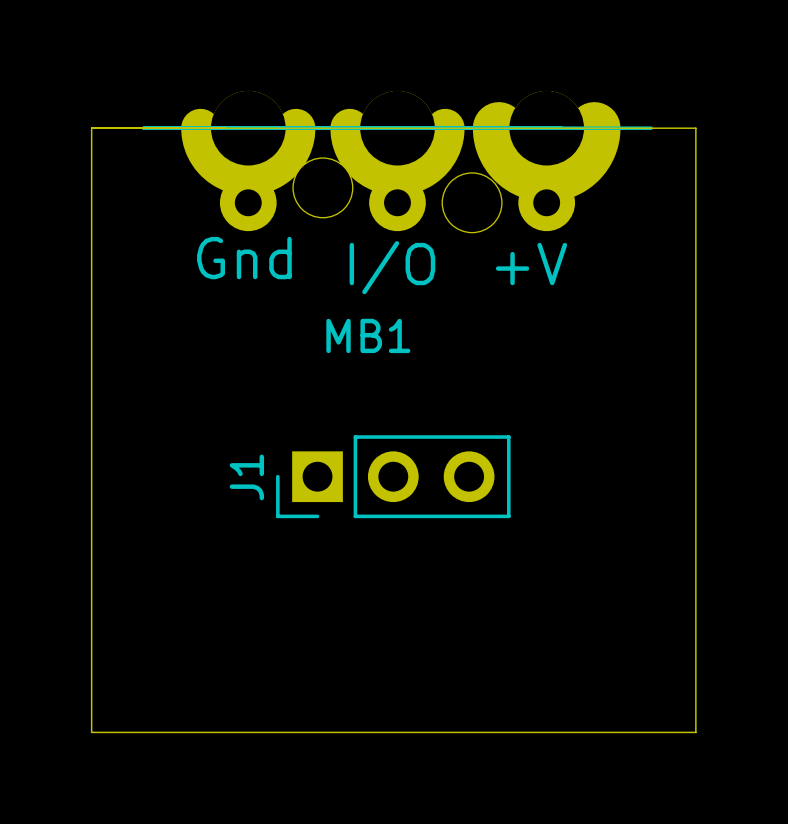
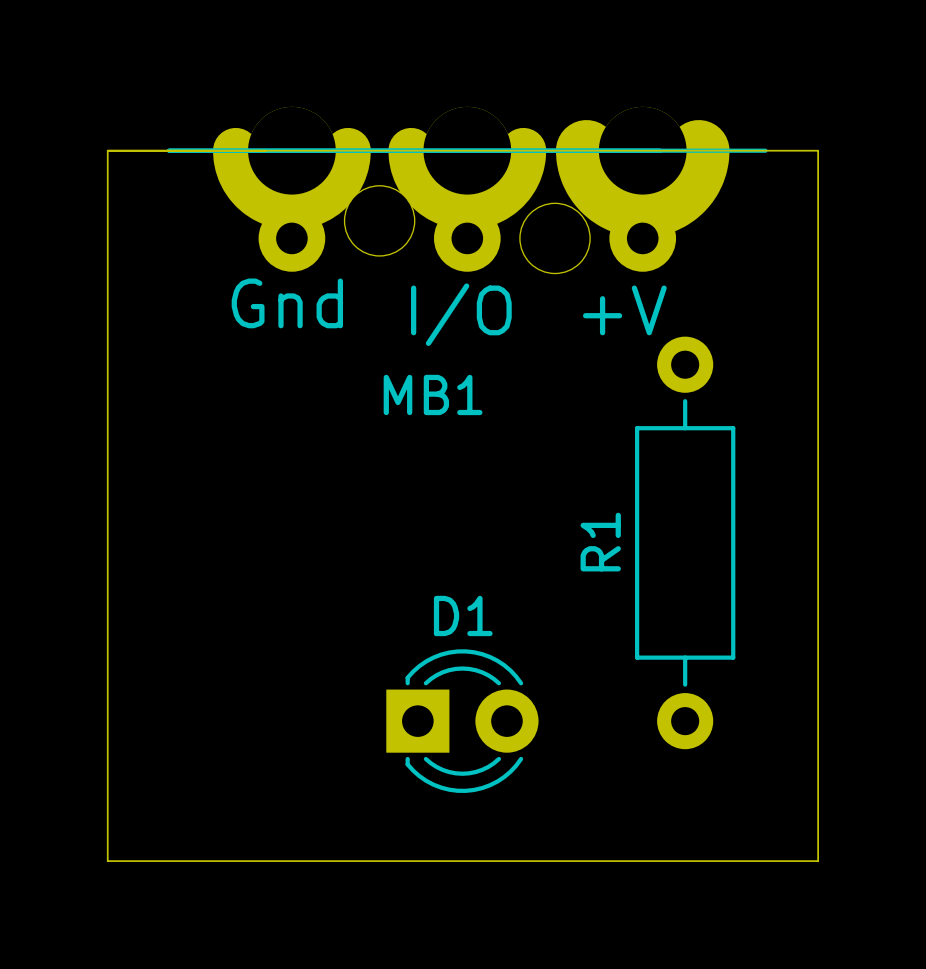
R1: none -> (685, 542)
J1: (393, 476) -> none
D1: none -> (462, 721)

